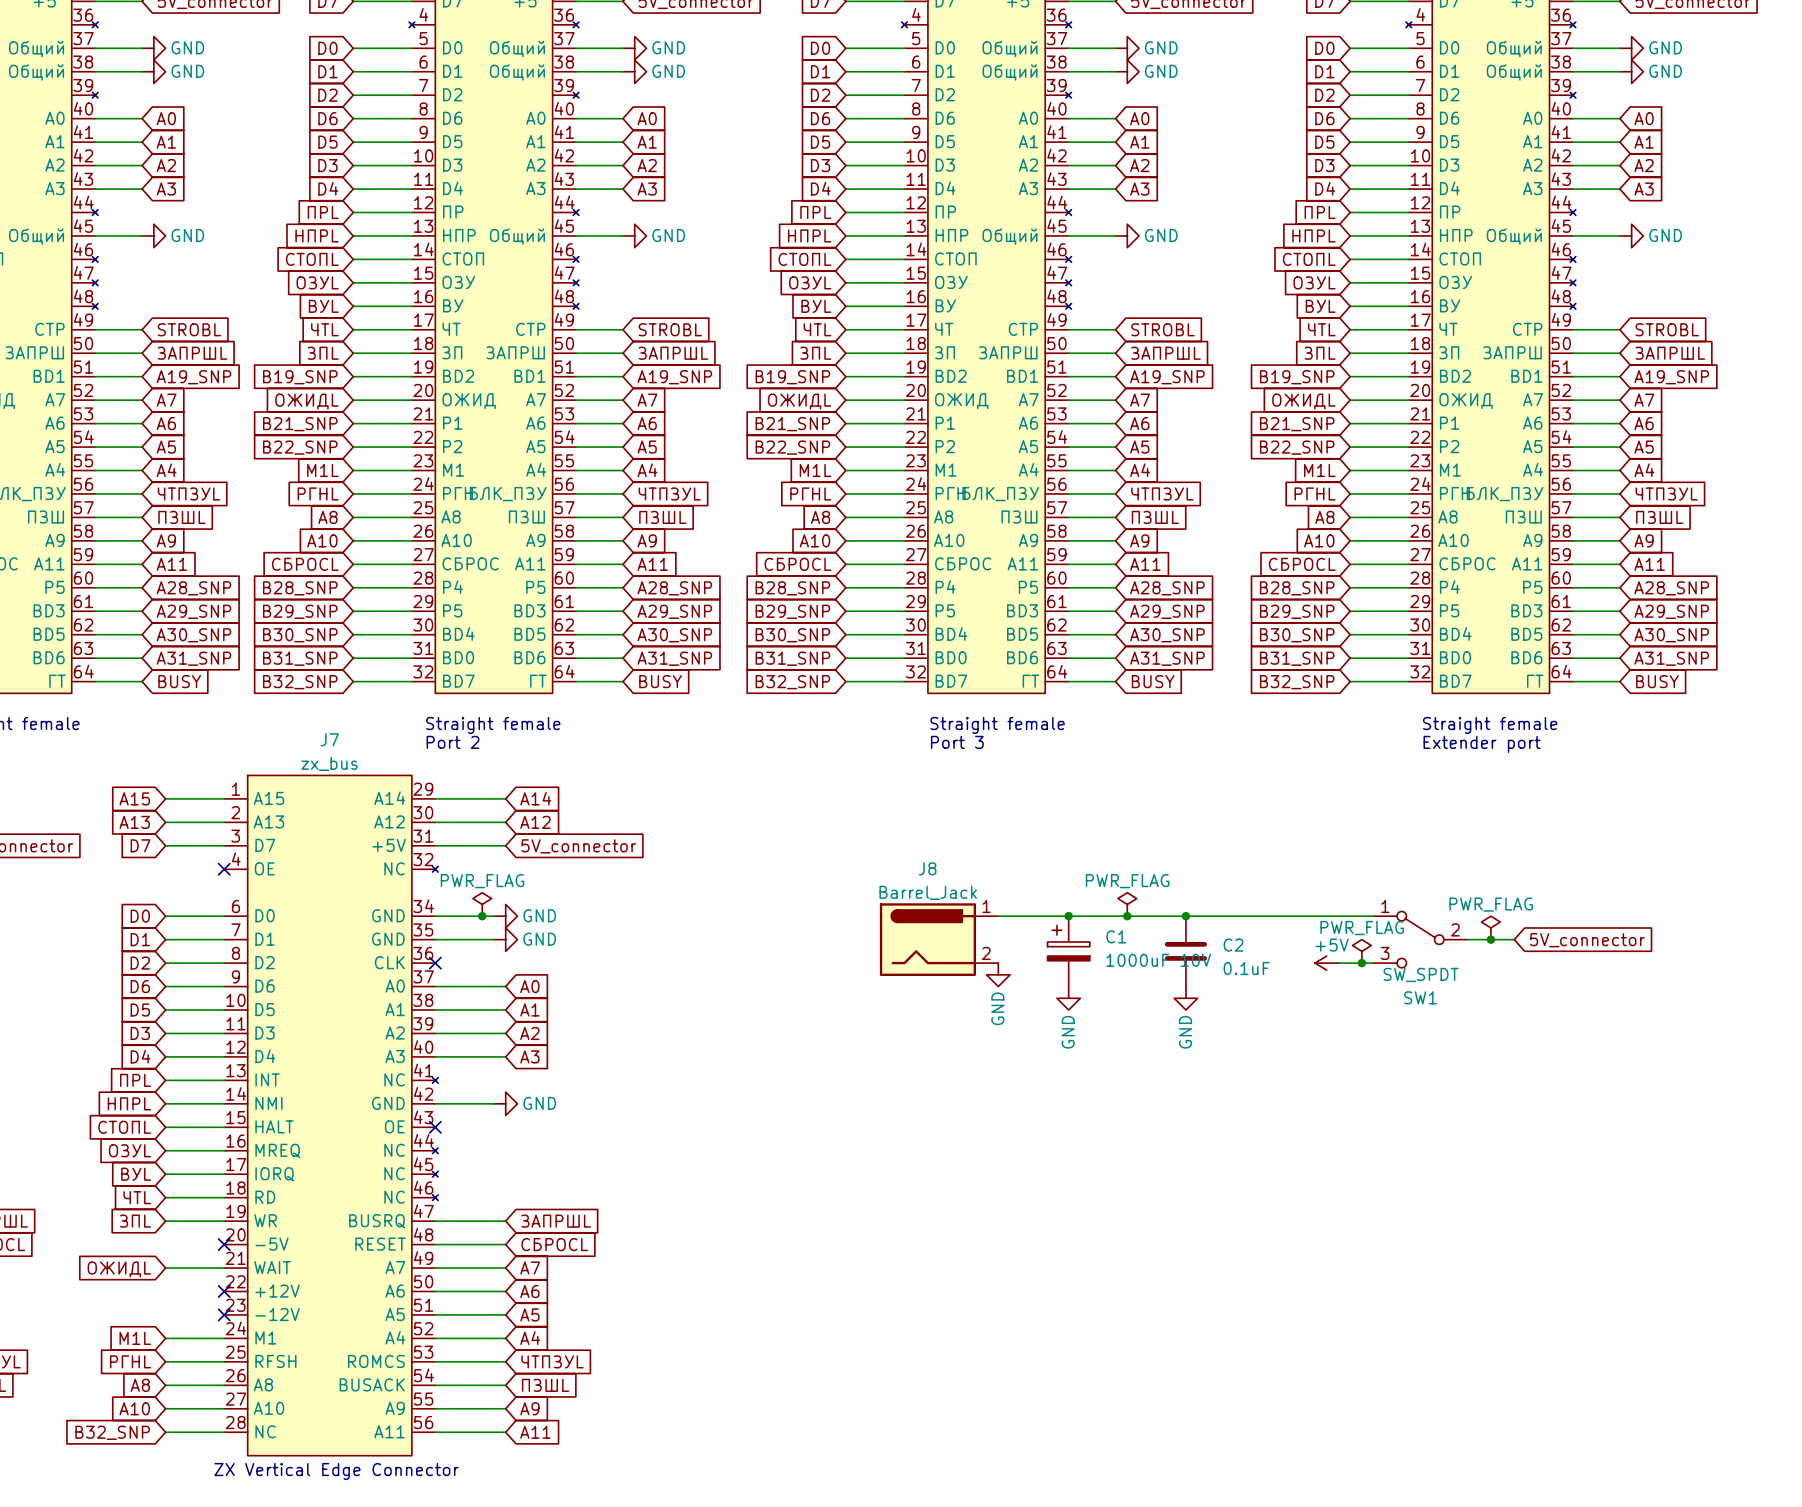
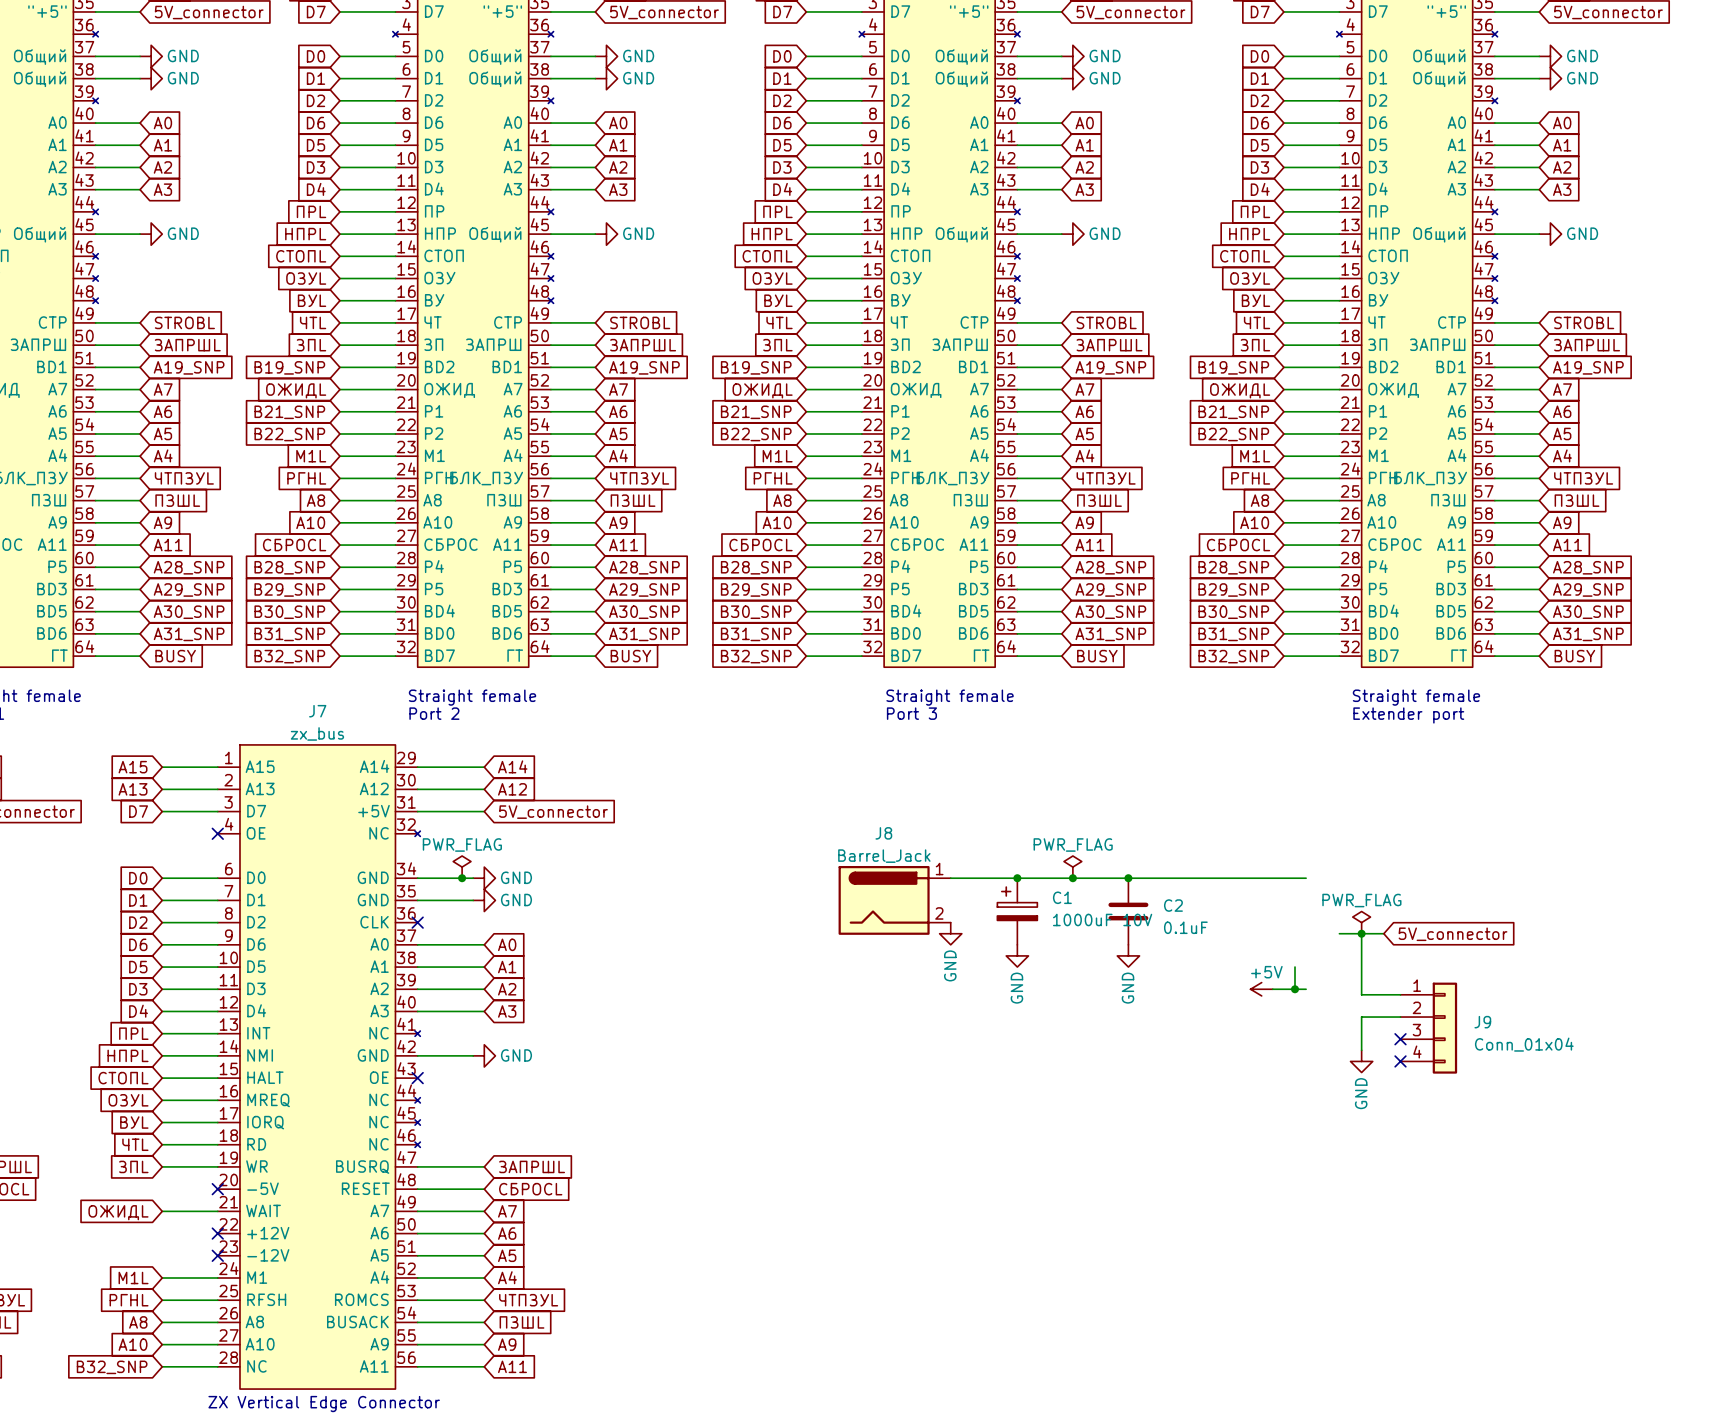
power symbol: PWR_FLAG (1490, 927) -> none
SW1: SW_SPDT (1420, 939) -> none
wire: (1467, 939) (1514, 939) -> (1339, 933) (1383, 933)
junction: (1490, 939) -> none
global label position: 5V_connector (1587, 940) -> 5V_connector (1453, 934)
power symbol: PWR_FLAG (1361, 951) -> none
power symbol position: +5V (1326, 963) -> +5V (1261, 989)
wire: (1338, 963) (1373, 963) -> (1272, 989) (1306, 989)
junction: (1361, 963) -> none
power symbol: none -> PWR_FLAG (1361, 922)
wire: none -> (1361, 933) (1361, 994) (1400, 994)
junction: none -> (1361, 933)
wire: none -> (1295, 967) (1295, 989)
junction: none -> (1295, 989)
wire: none -> (1400, 1017) (1361, 1017) (1361, 1050)
J9: none -> Conn_01x04 (1428, 1028)
no-connect mark: none -> (1400, 1039)
power symbol: none -> GND (1361, 1061)
no-connect mark: none -> (1400, 1061)

